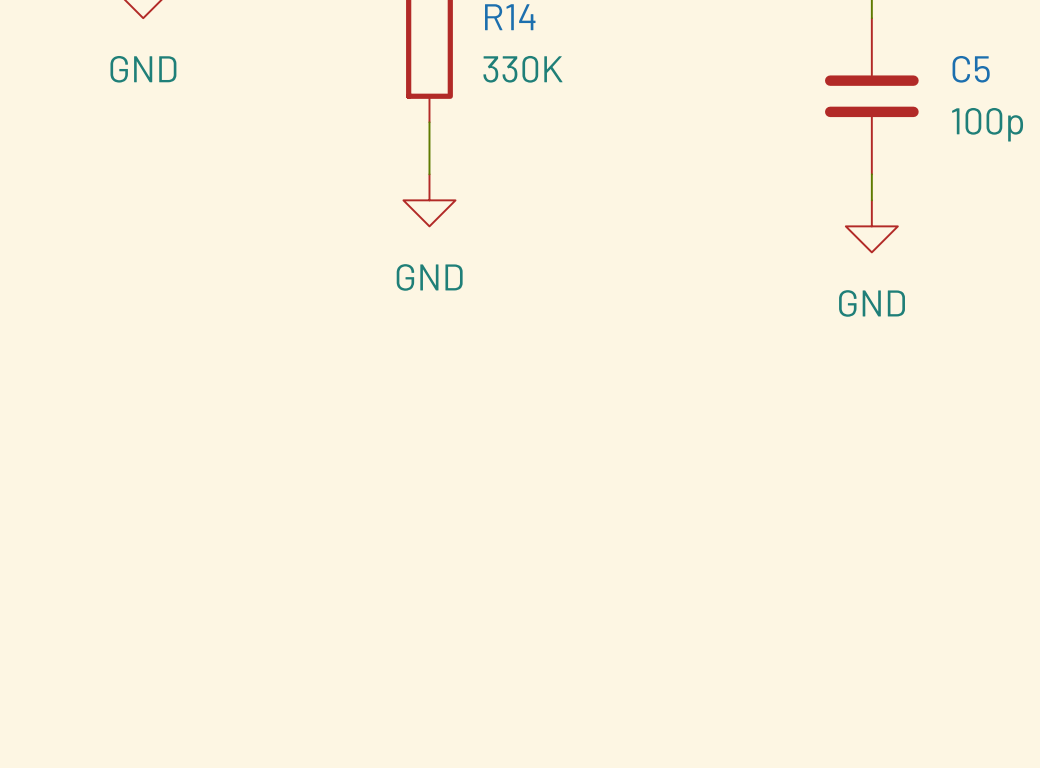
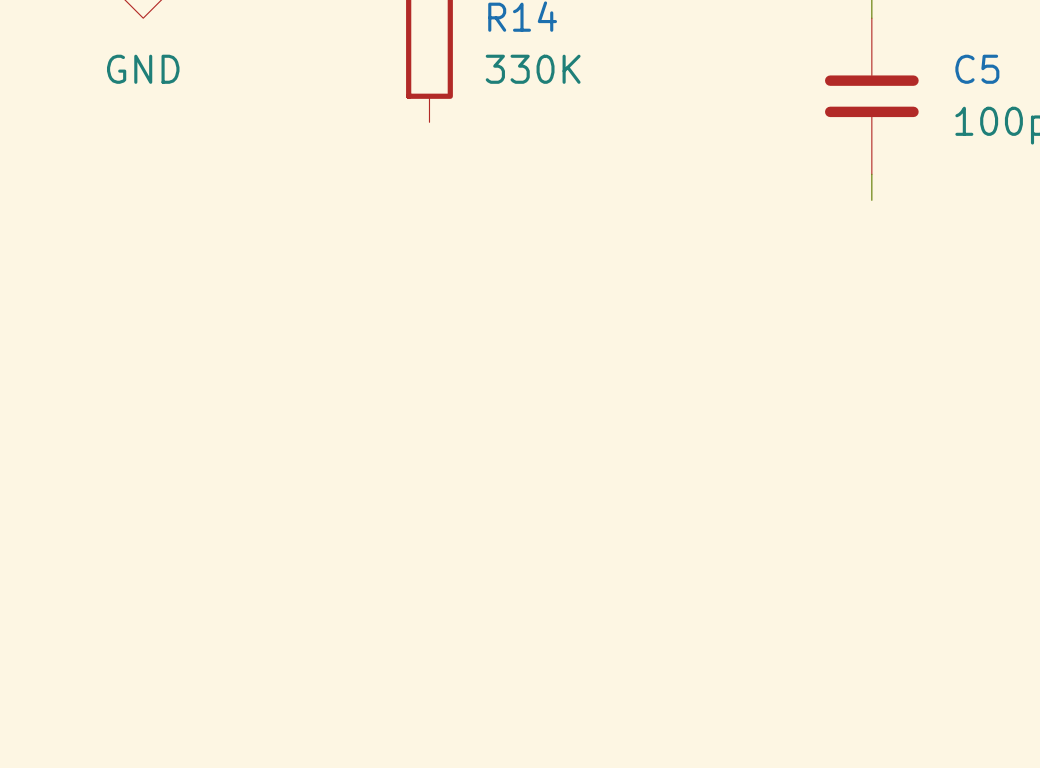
wire: (429, 122) (429, 174) -> none
power symbol: GND (429, 200) -> none
power symbol: GND (871, 226) -> none

